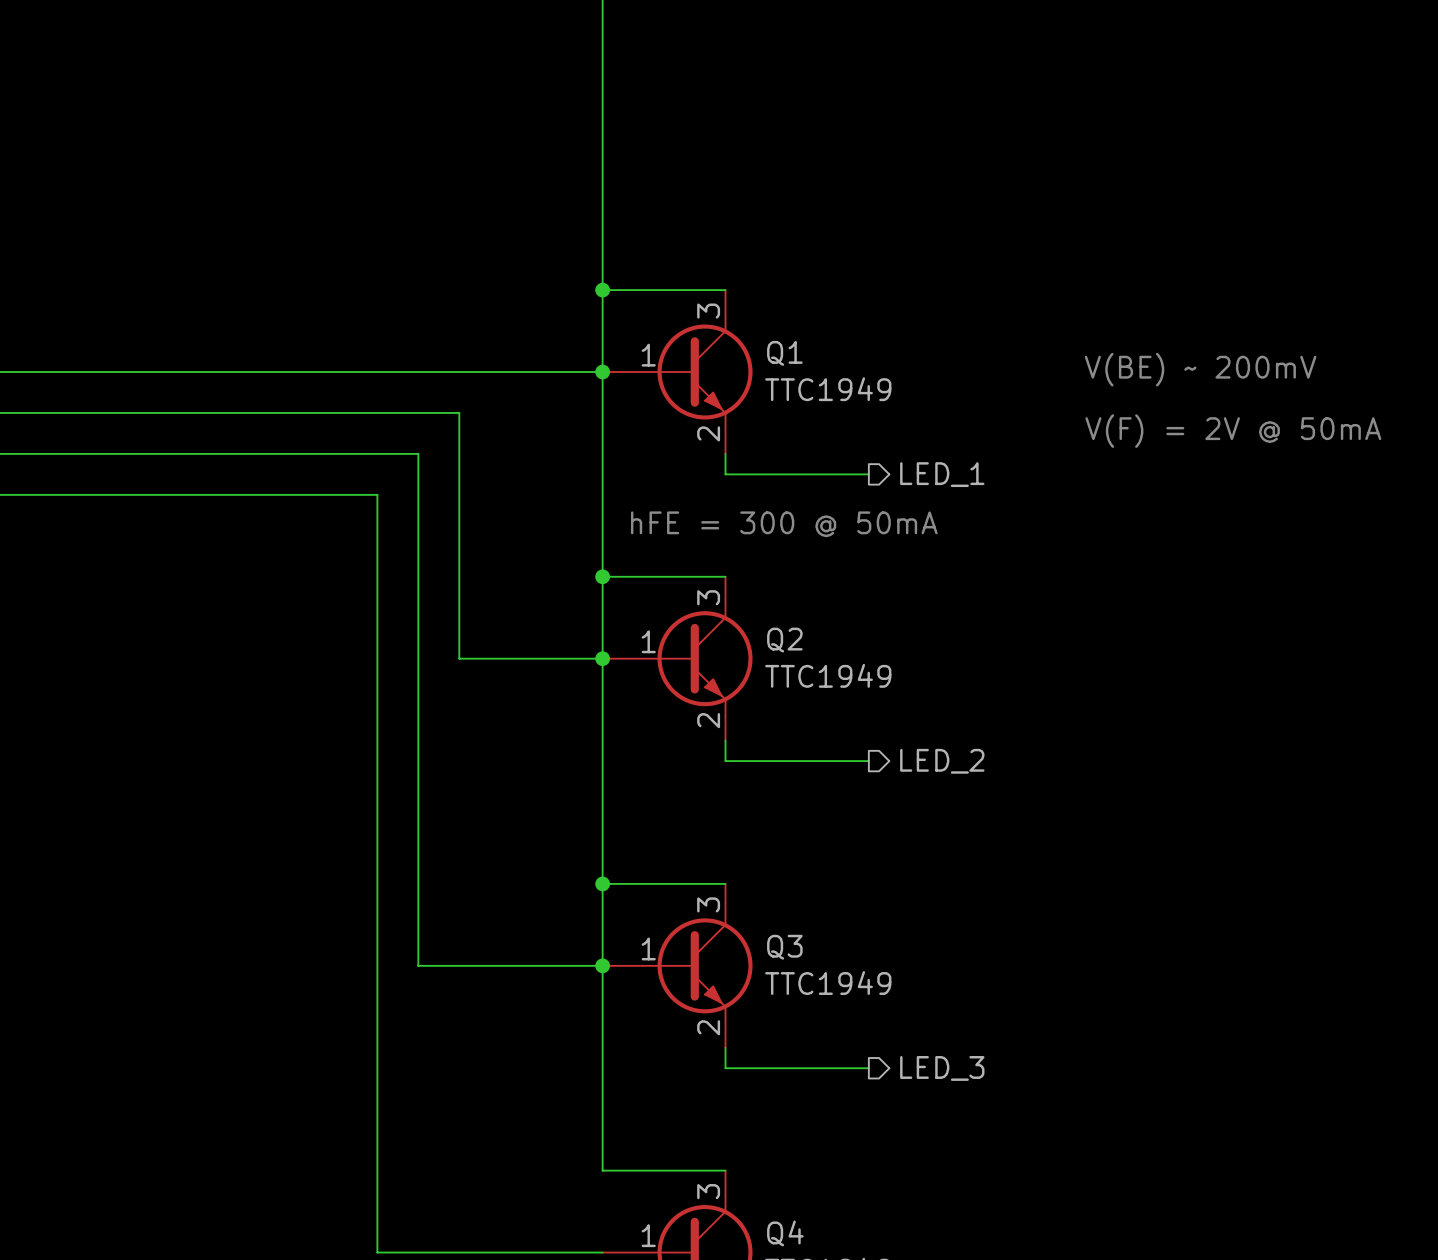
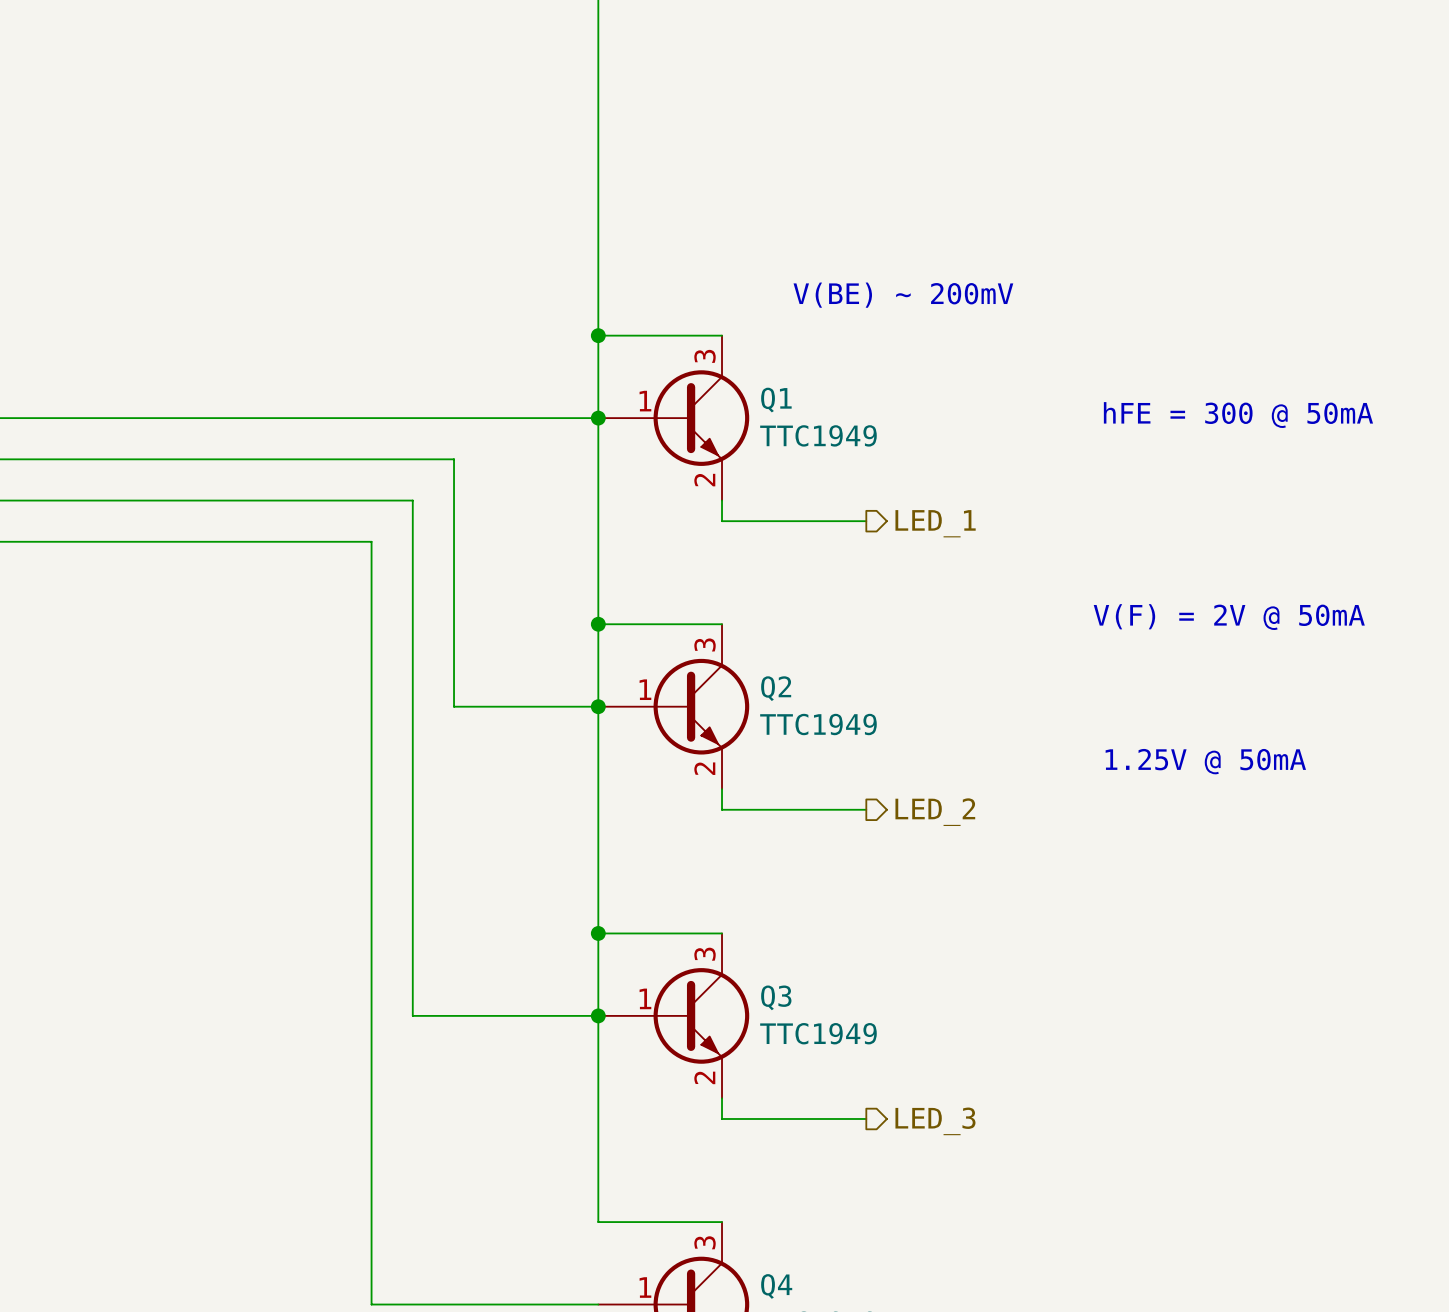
text: none -> hFE = 300 @ 50mA (1238, 415)
text position: V(BE) ~ 200mV (1200, 369) -> V(BE) ~ 200mV (903, 295)
text position: V(F) = 2V @ 50mA (1233, 431) -> V(F) = 2V @ 50mA (1229, 617)
text: hFE = 300 @ 50mA (784, 524) -> none
text: none -> 1.25V @ 50mA (1205, 761)

